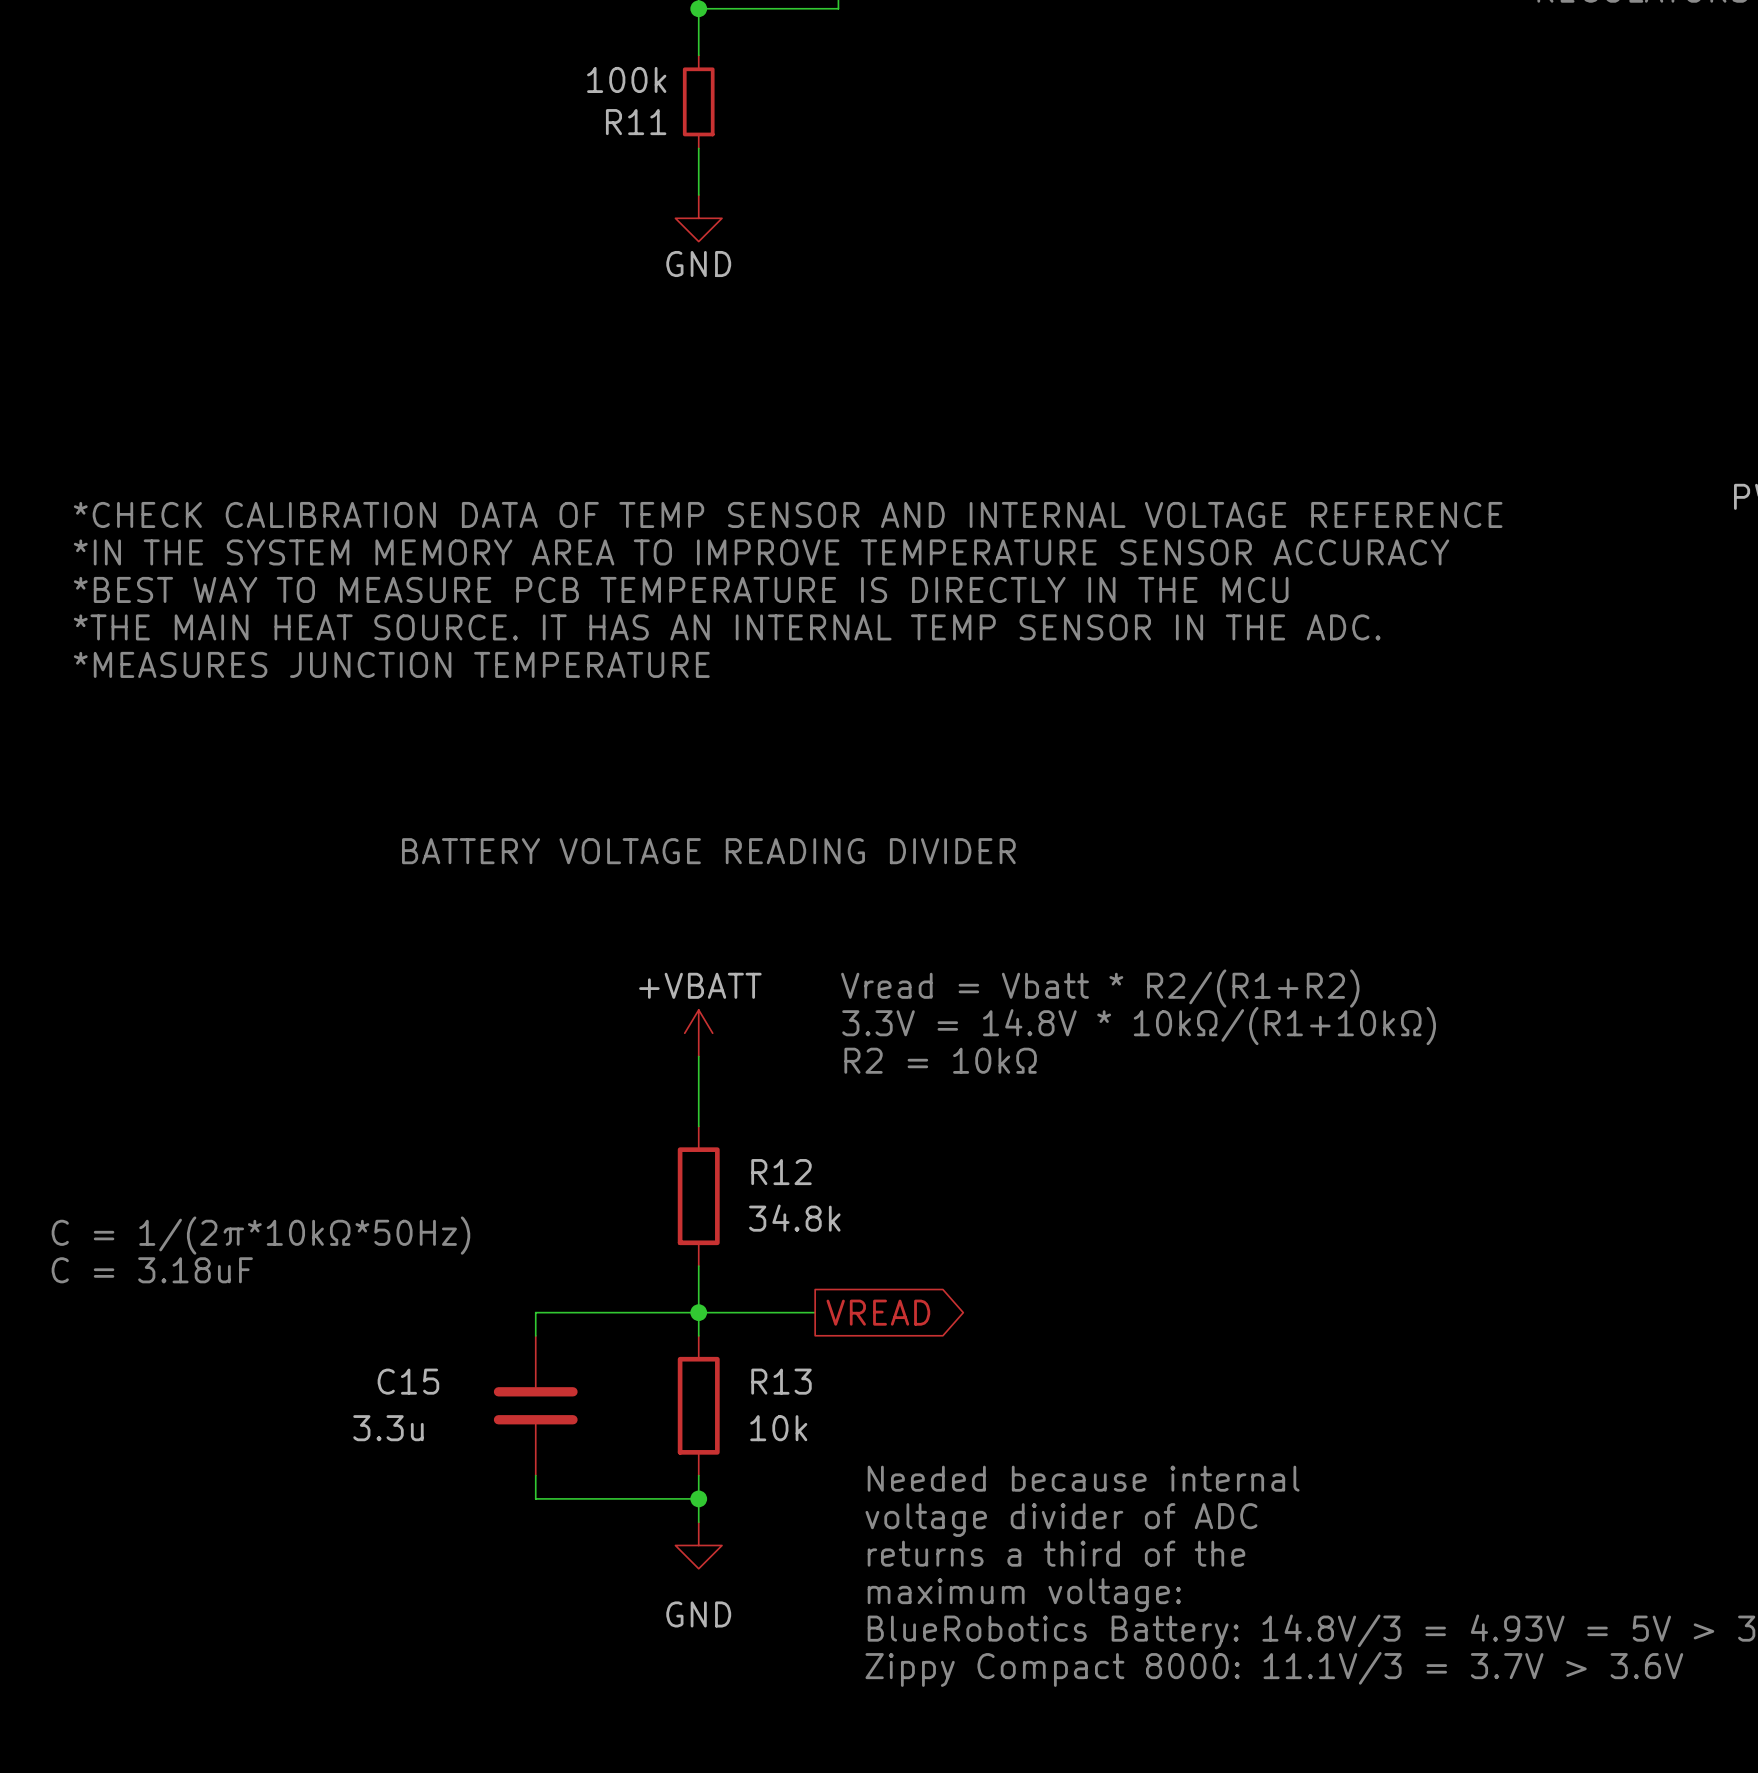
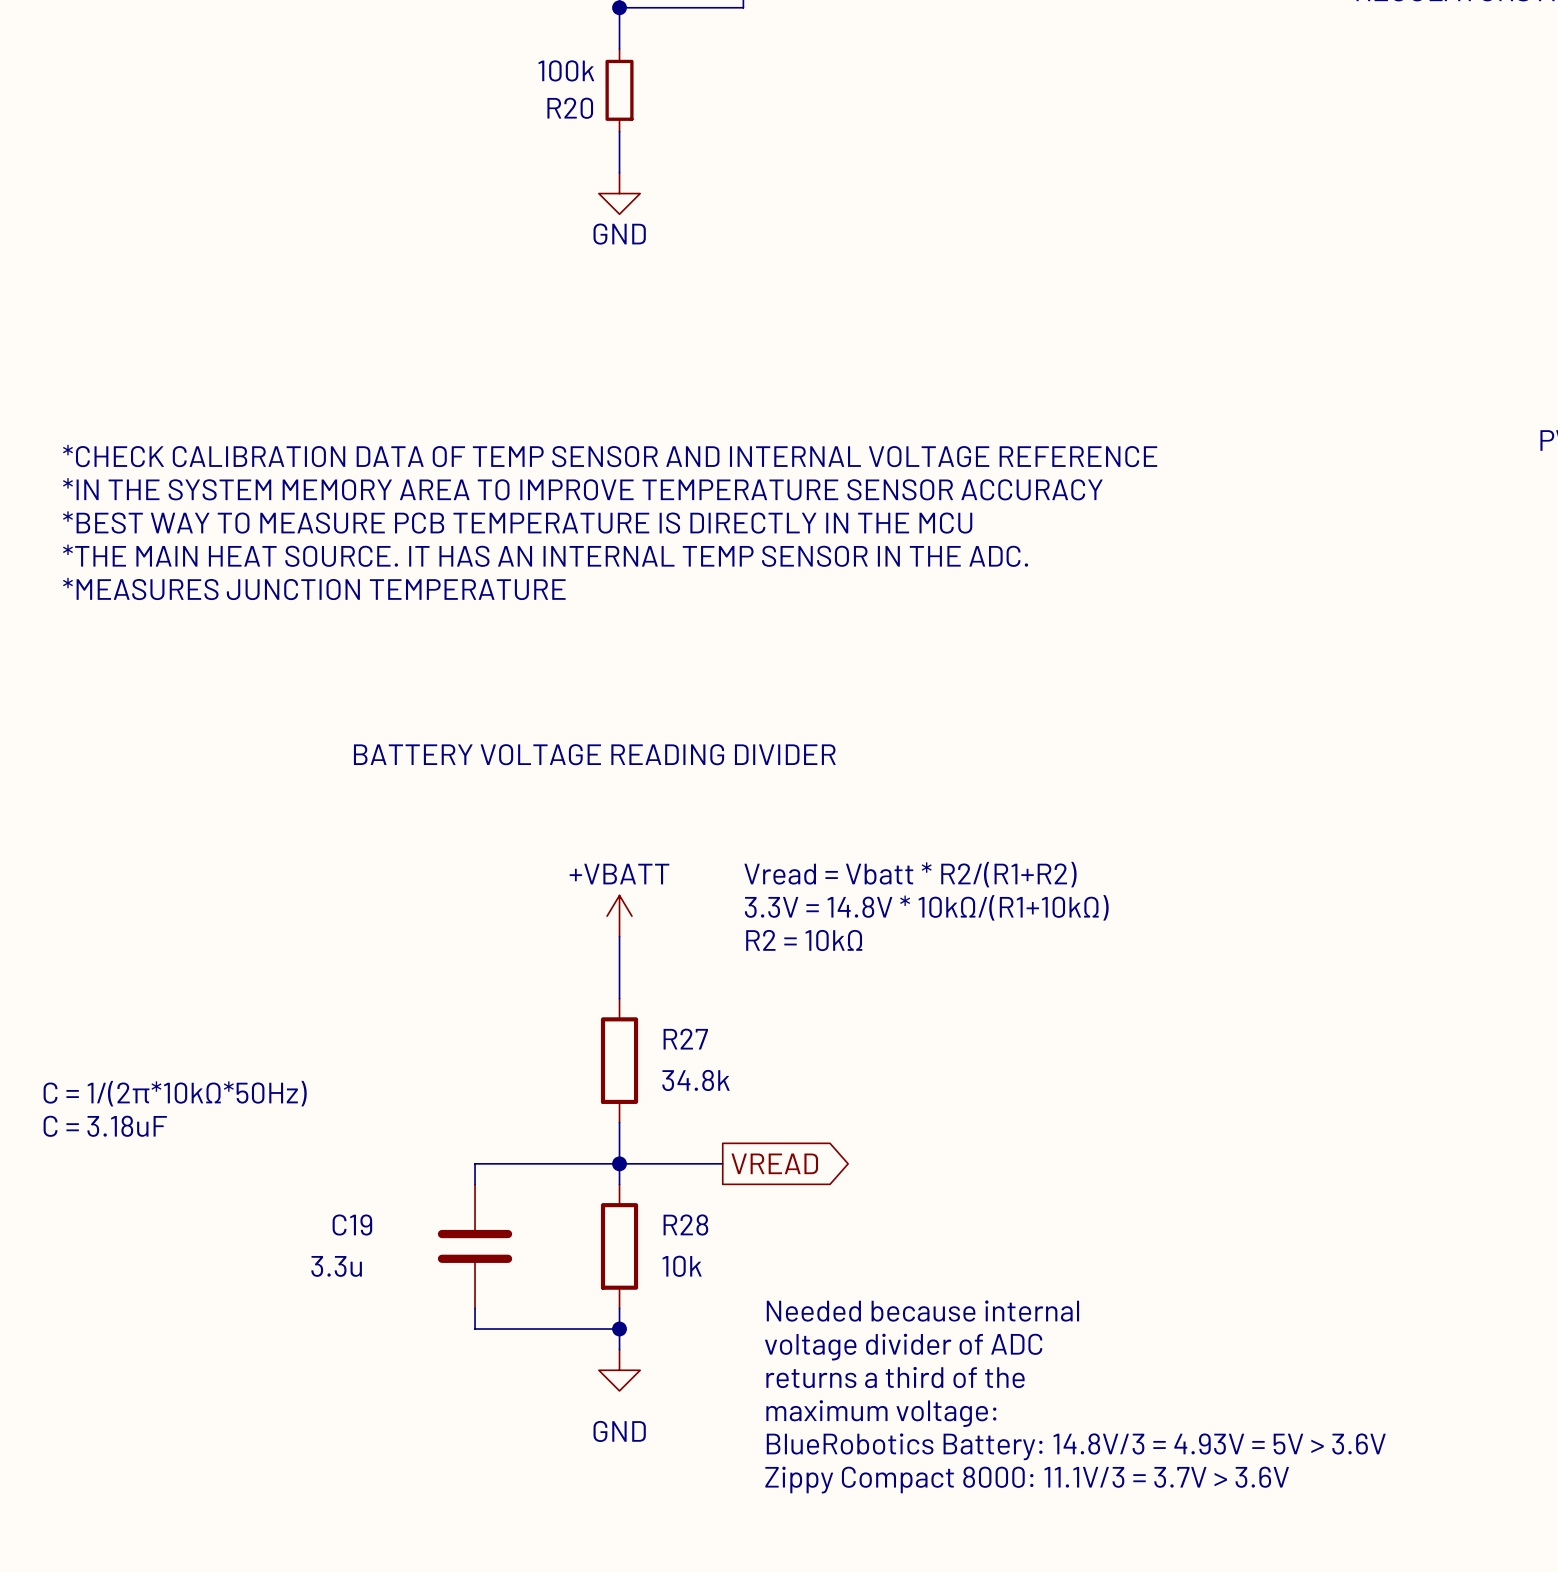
R11 name: R11 (636, 122) -> R20 (570, 108)
R12 name: R12 (781, 1172) -> R27 (685, 1039)
C15 name: C15 (408, 1381) -> C19 (352, 1225)
R13 name: R13 (781, 1381) -> R28 (685, 1224)

